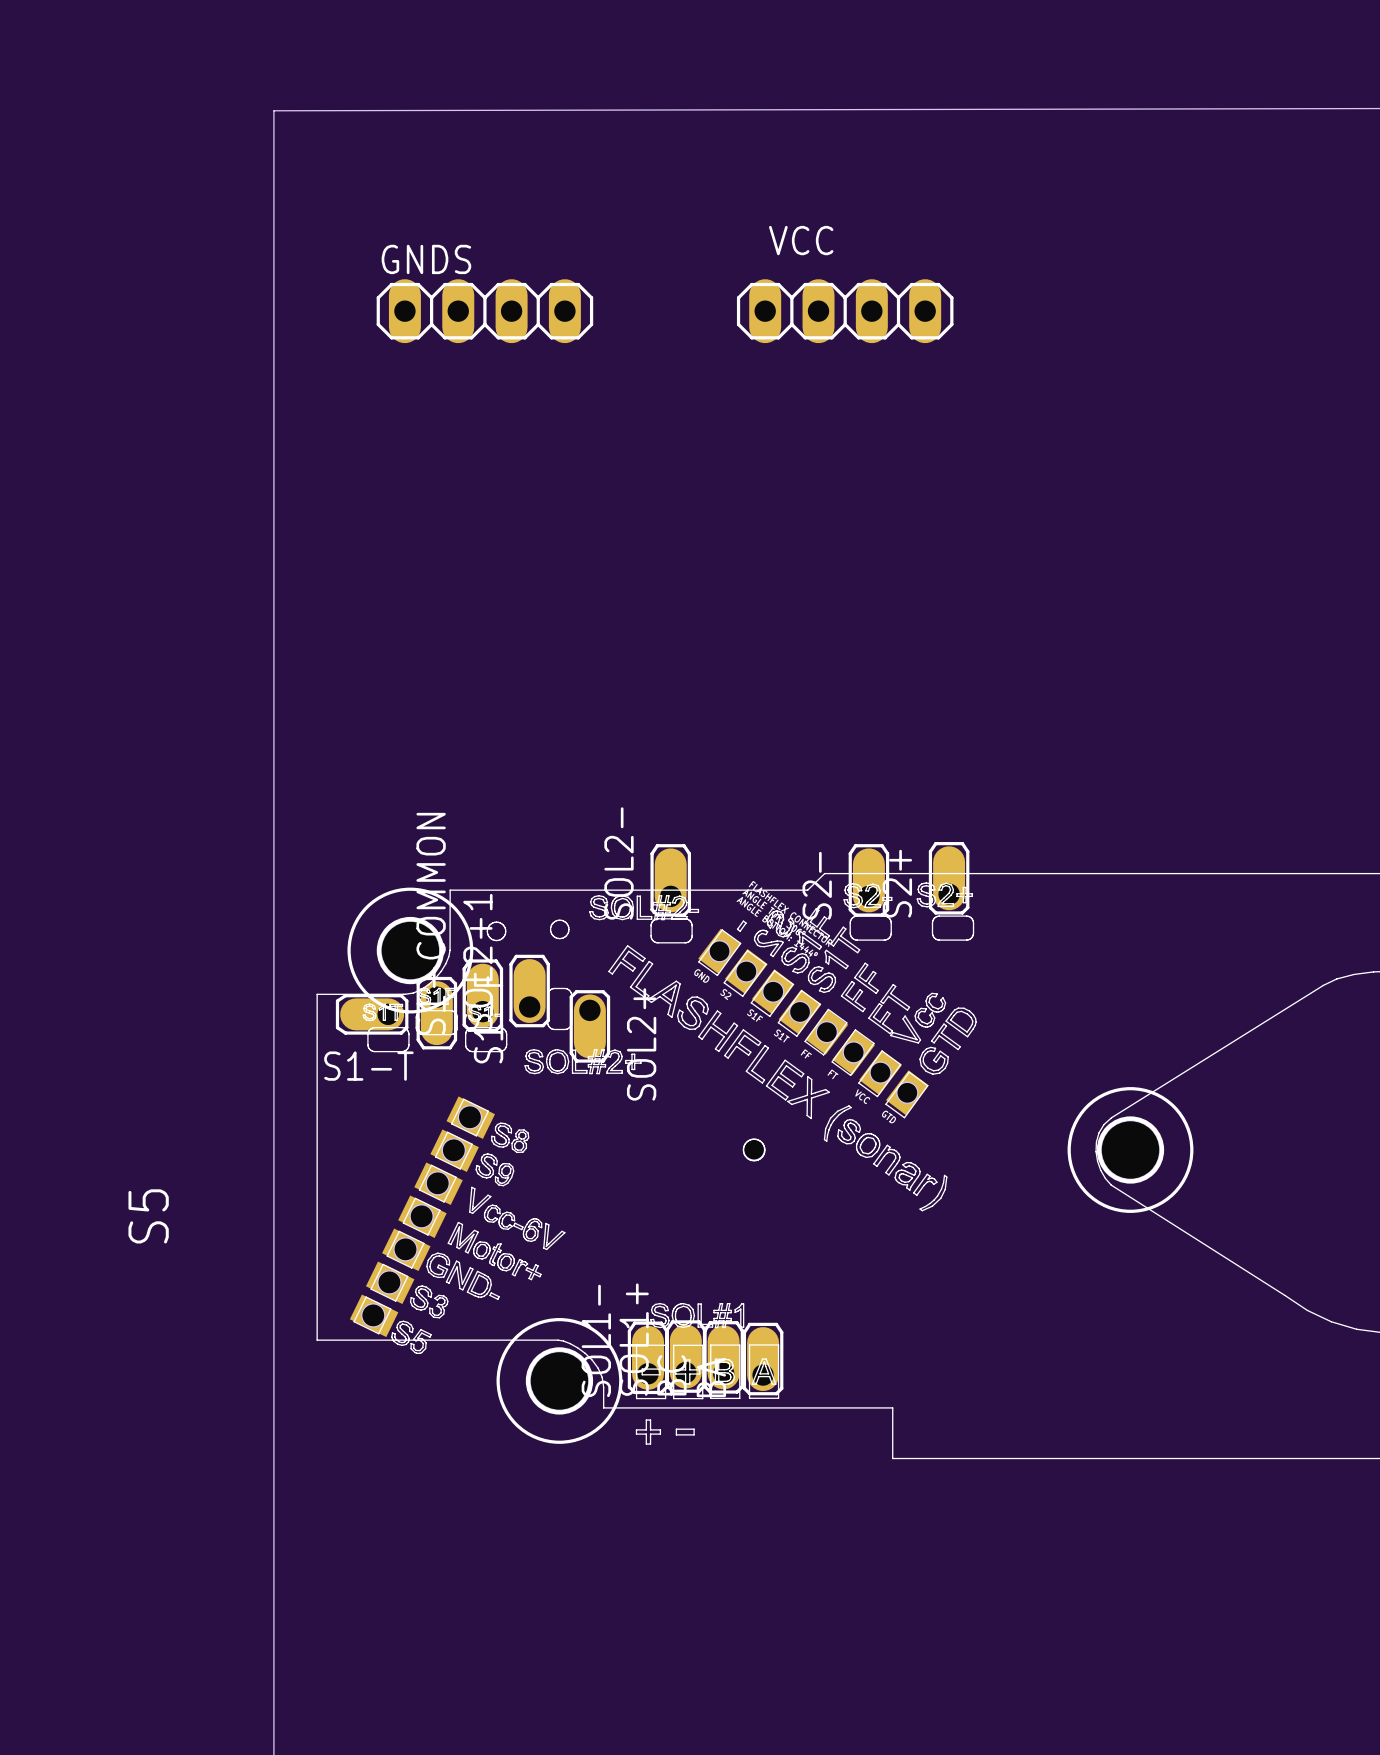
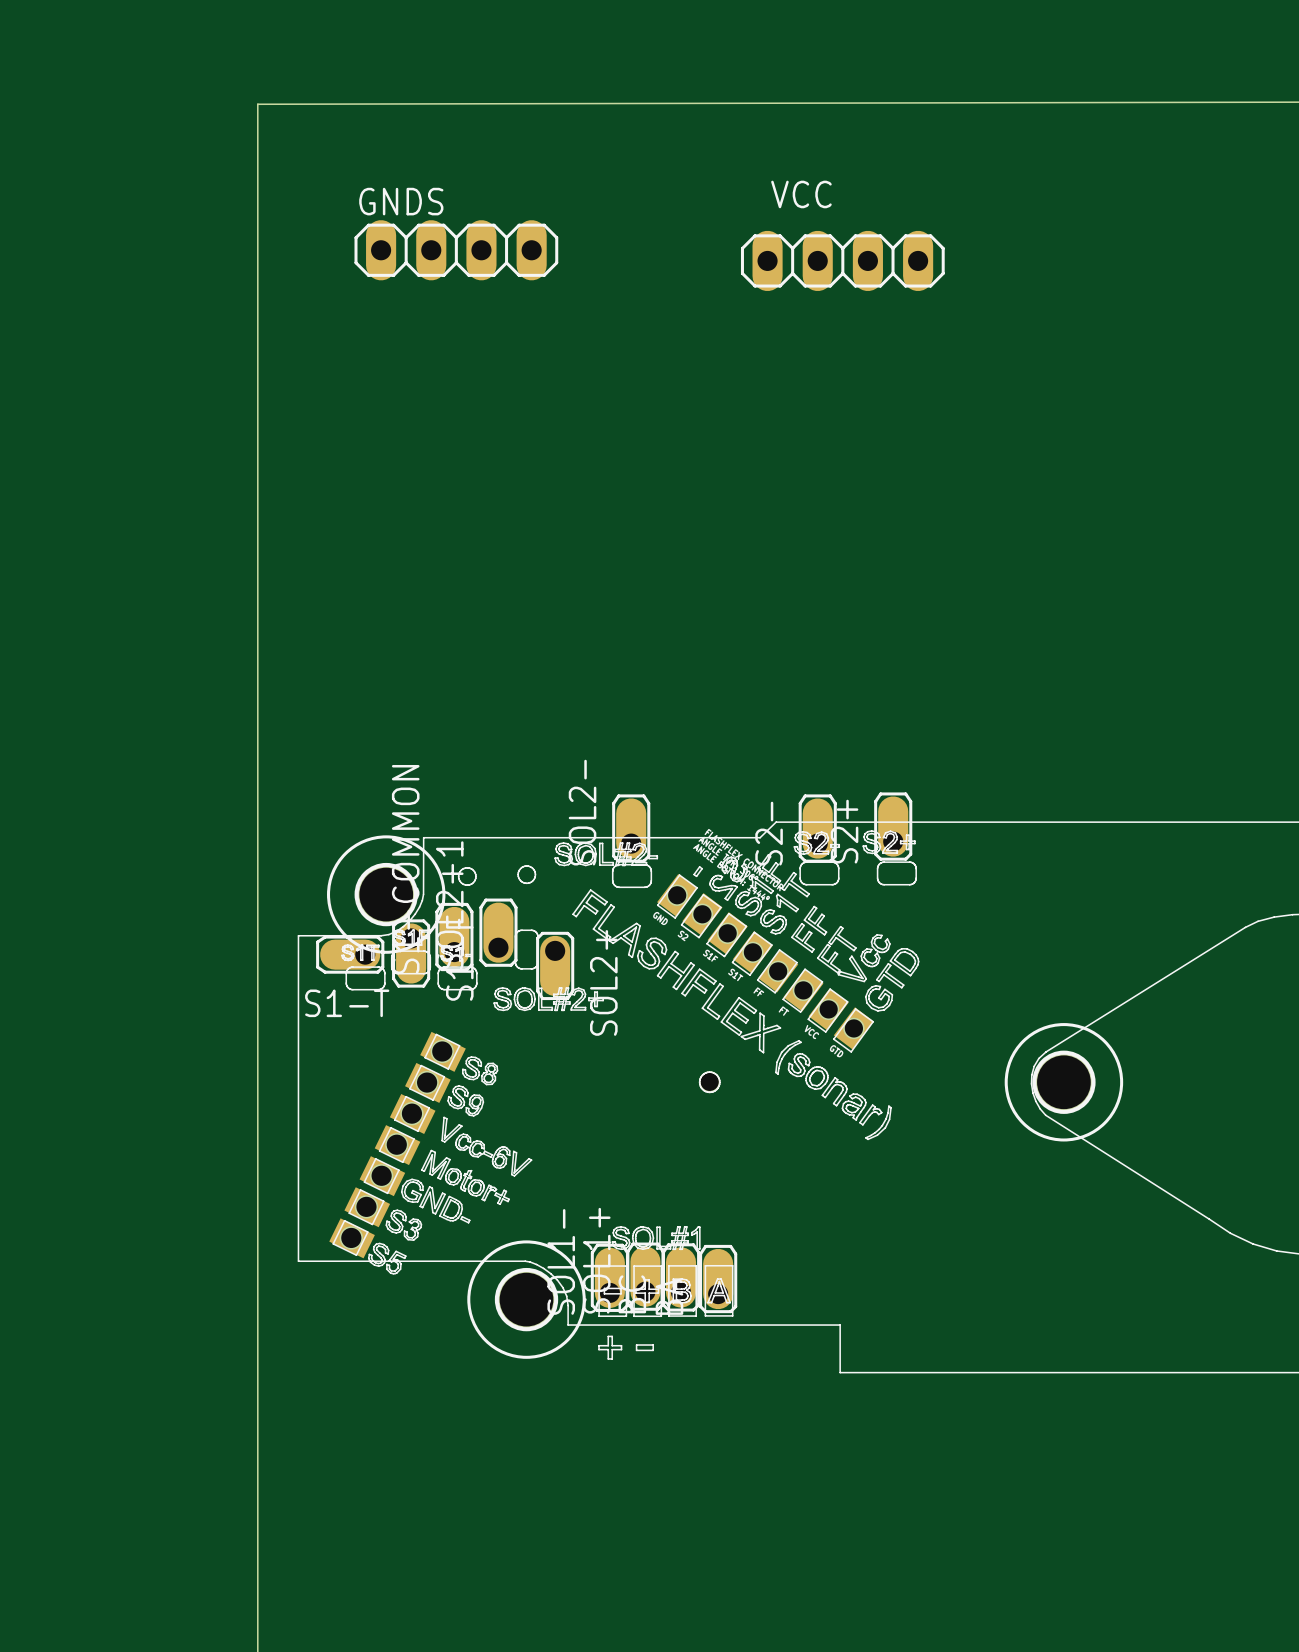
GNDS position: (484, 311) -> (456, 250)
VCC position: (845, 311) -> (842, 260)
text: S5 (148, 1216) -> none

